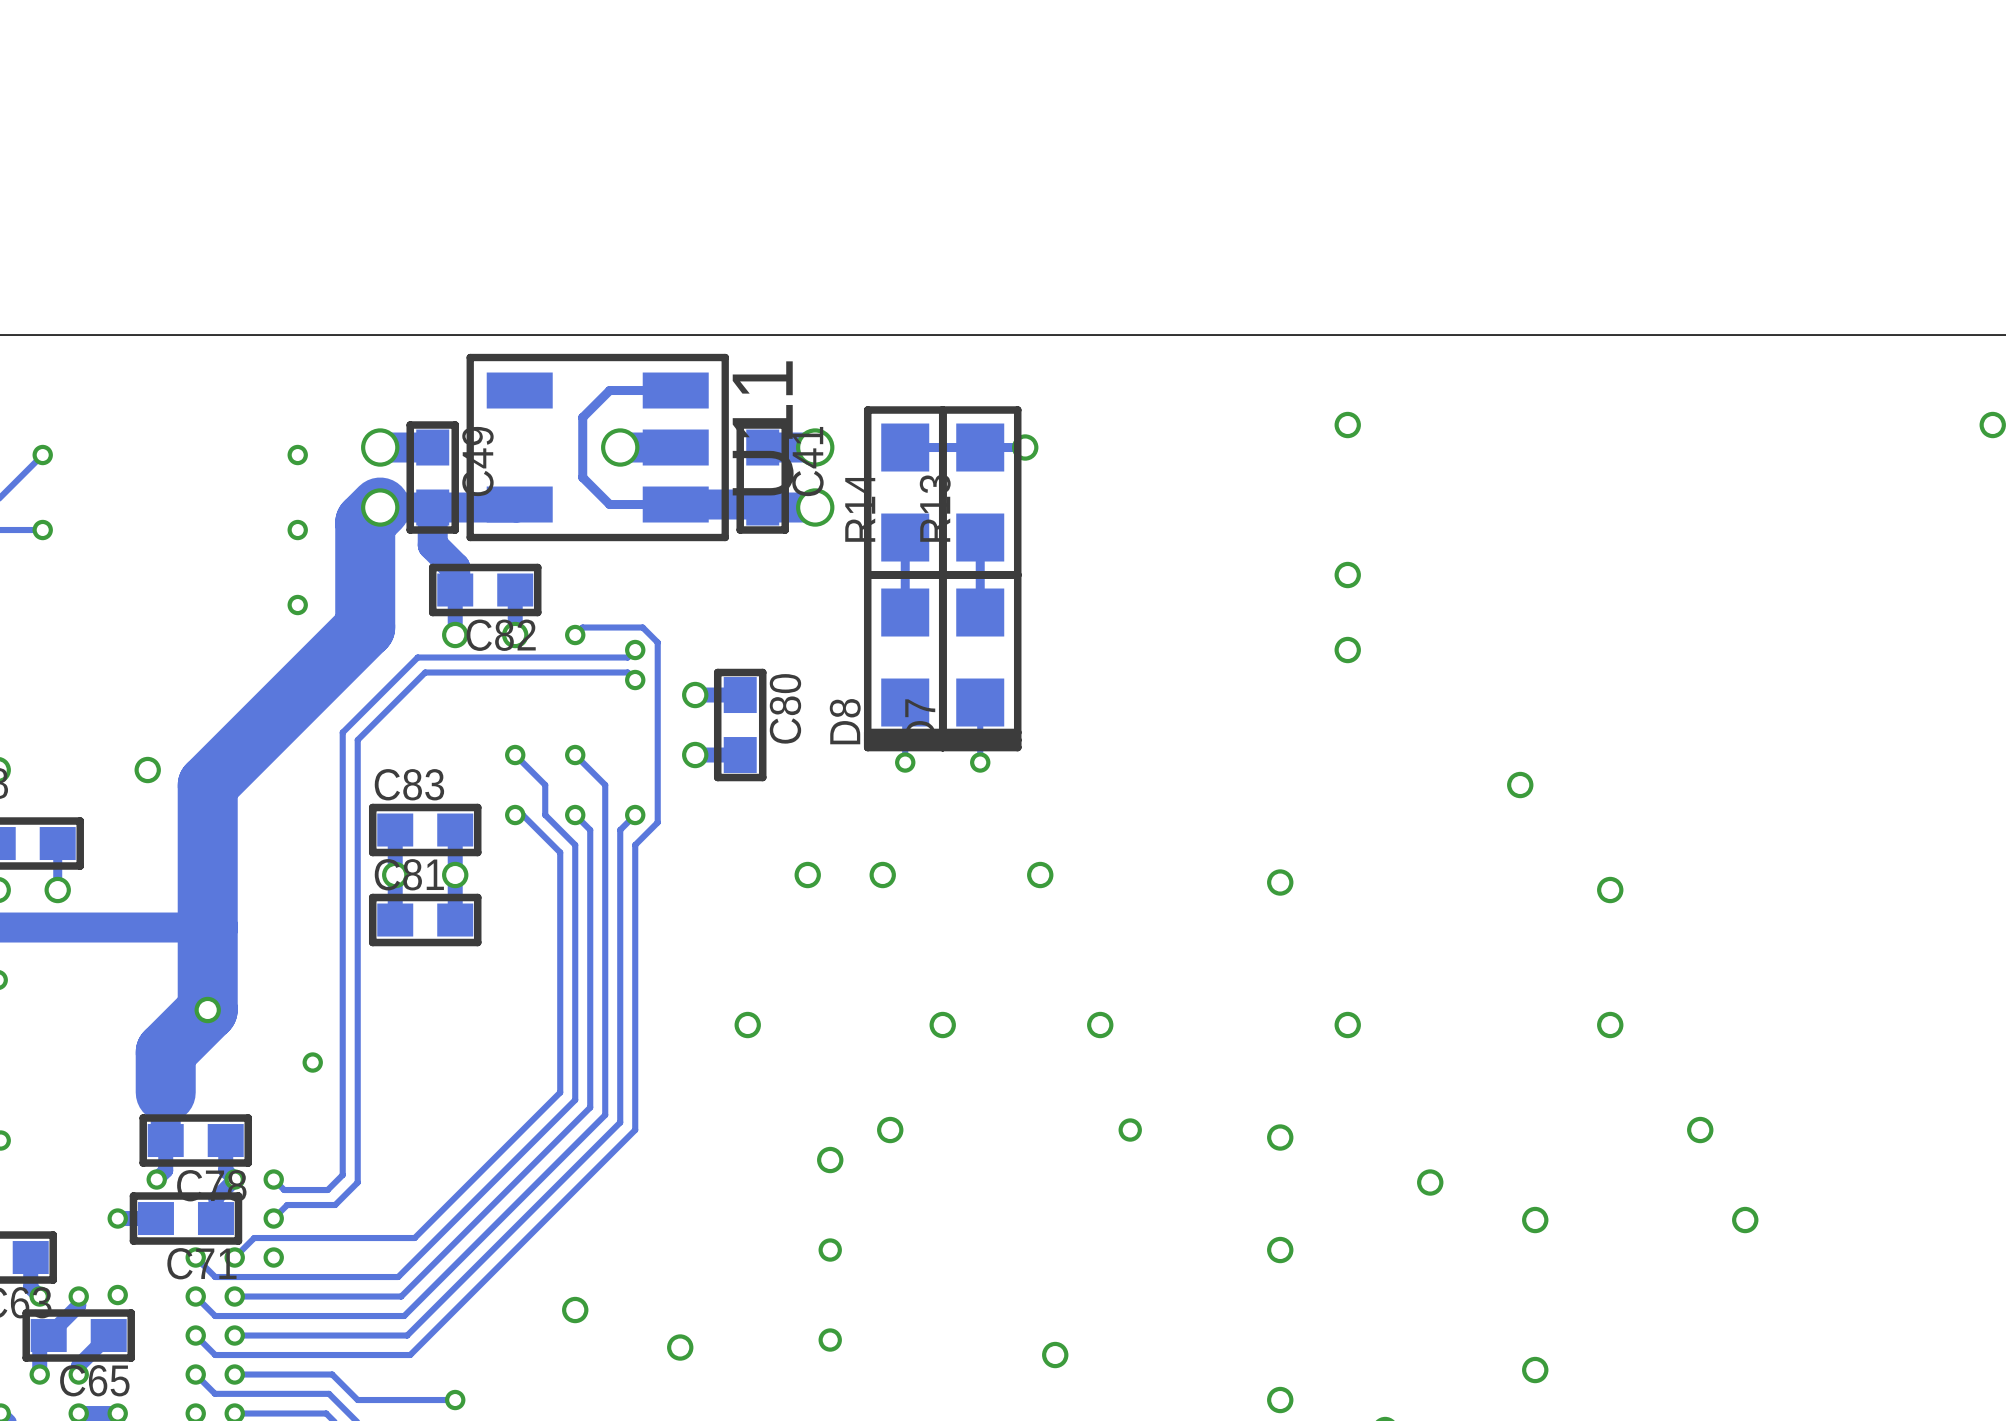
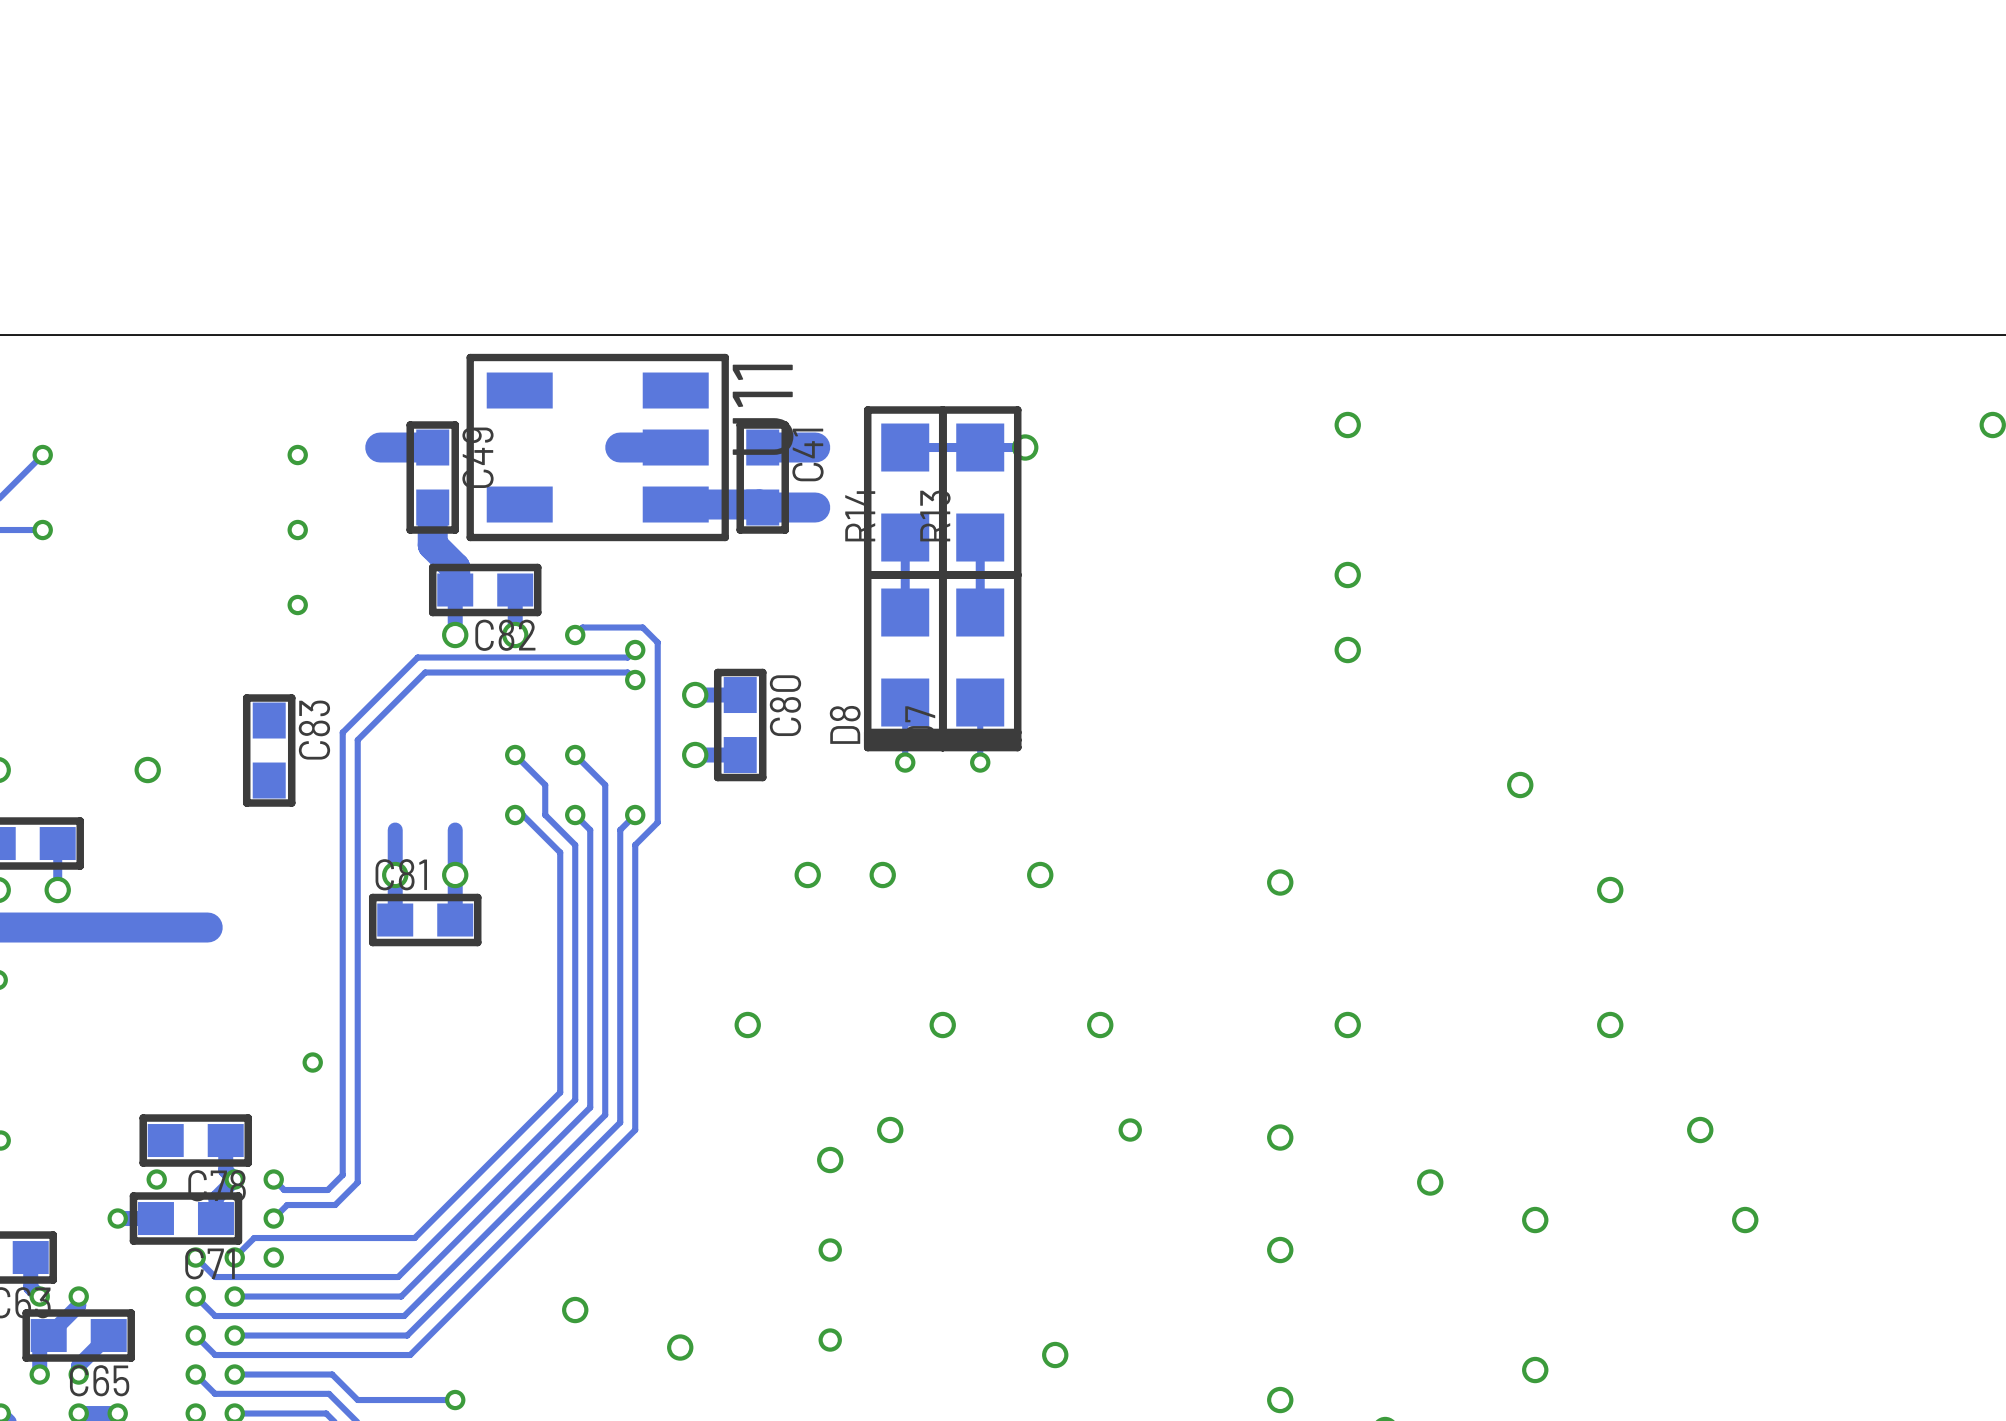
track: (675, 390) (609, 390) (582, 417) (582, 477) (609, 504) (675, 504) (678, 507) (762, 507) -> none
via: (380, 447) -> none
via: (620, 447) -> none
via: (815, 447) -> none
track: (519, 504) (516, 507) (380, 507) (365, 522) (365, 627) (207, 785) (207, 1010) (165, 1052) (165, 1170) (156, 1179) -> none
via: (380, 507) -> none
via: (815, 507) -> none
C83 rotation: 0° (425, 830) -> 90° clockwise (269, 750)
C83 position: (425, 830) -> (269, 750)
via: (207, 1010) -> none
via: (117, 1295) -> none

